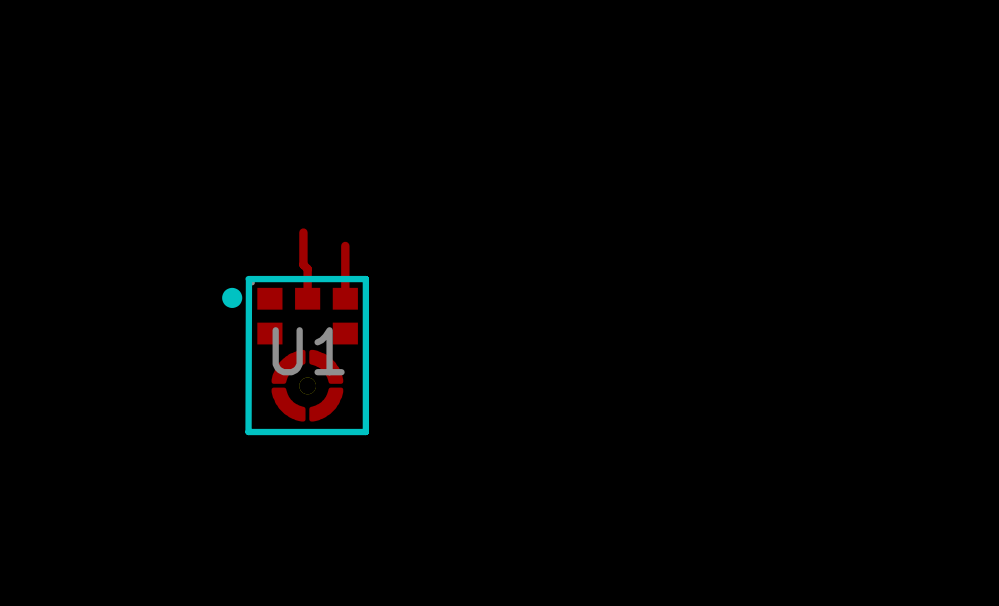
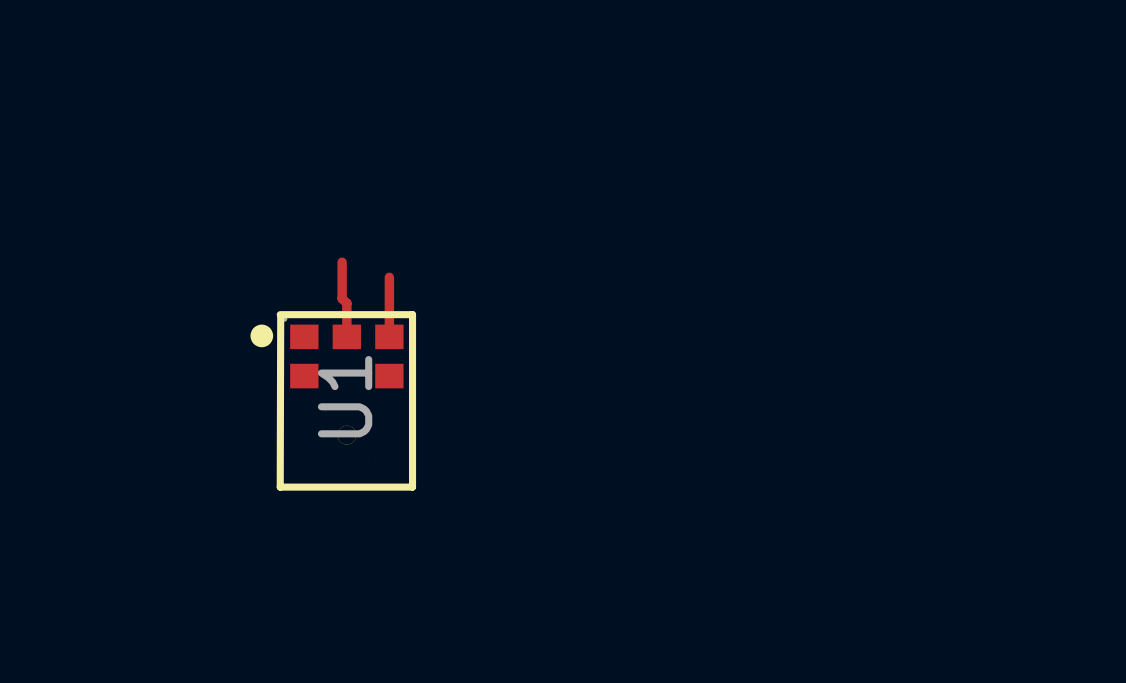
U1 footprint: [222, 275, 370, 436] -> [250, 311, 417, 491]
U1 name rotation: 0° (308, 351) -> 90° counterclockwise (345, 396)

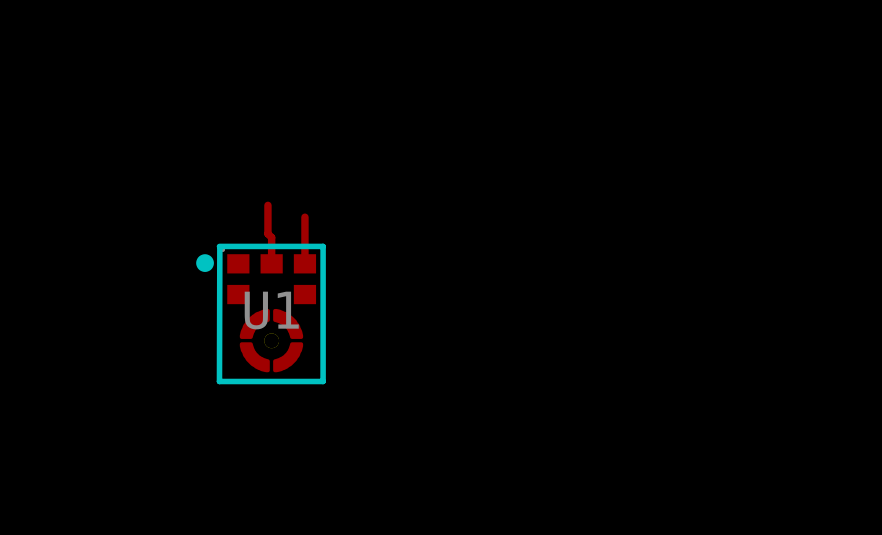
U1 footprint: [250, 311, 417, 491] -> [196, 243, 326, 385]
U1 name rotation: 0° (345, 396) -> 90° clockwise (271, 310)

